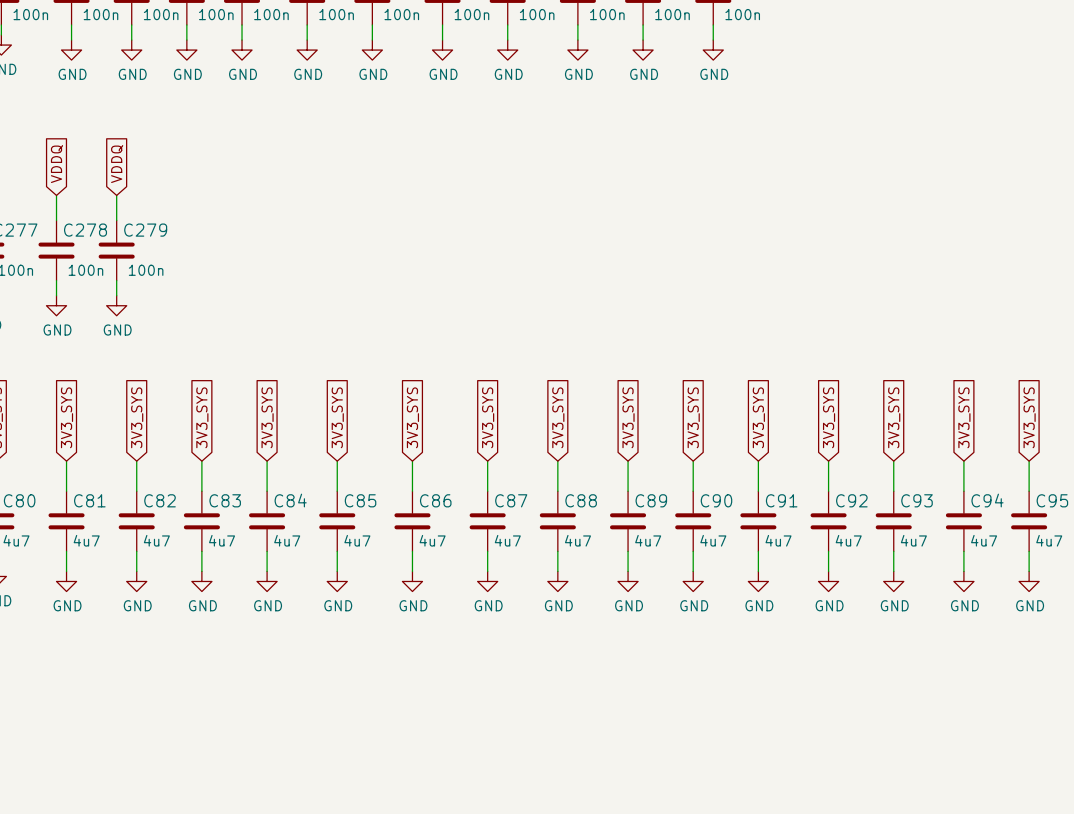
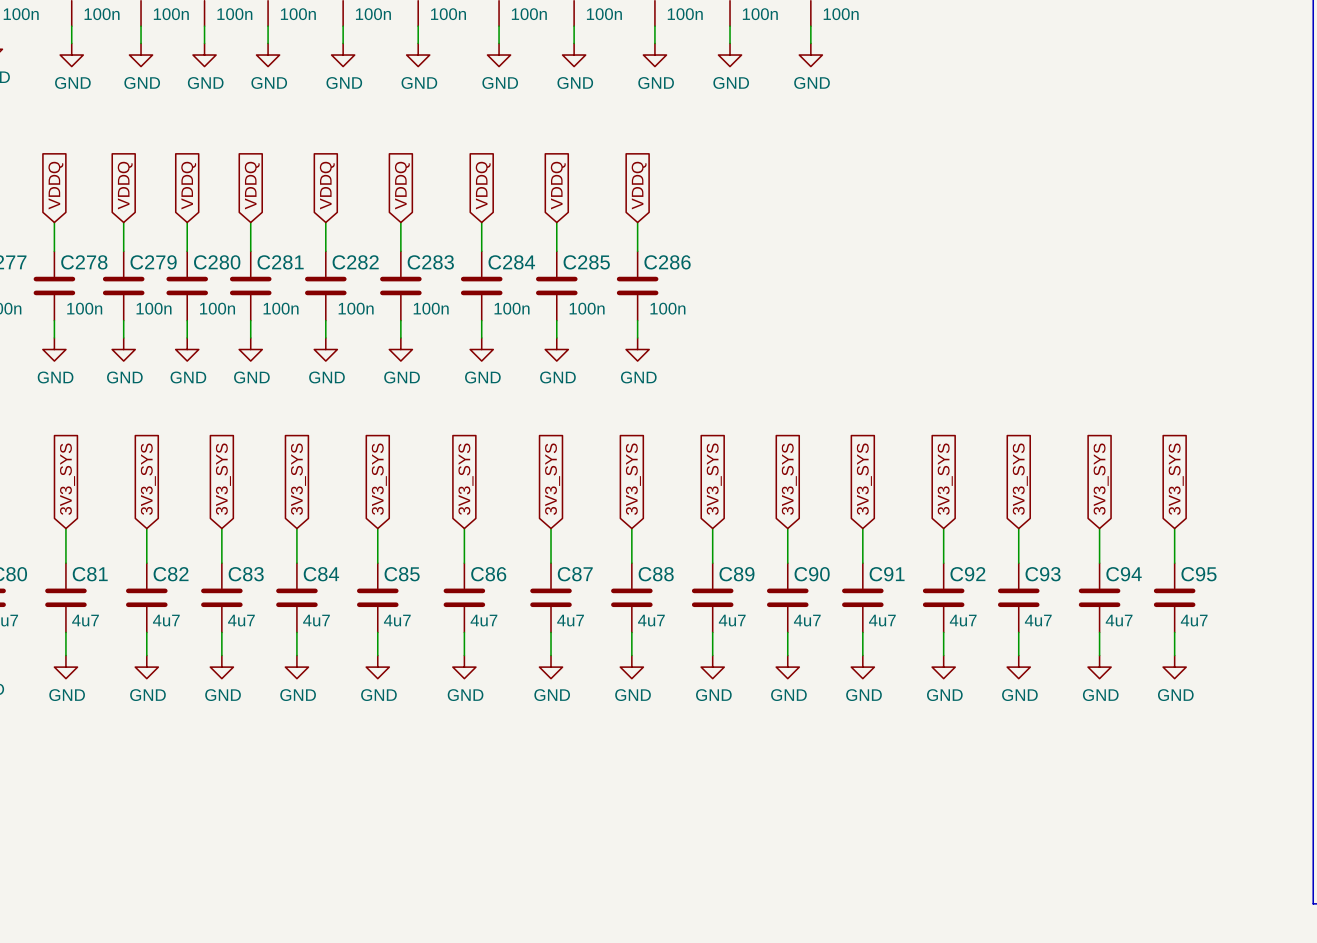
global label: none -> VDDQ (188, 185)
global label: none -> VDDQ (252, 185)
global label: none -> VDDQ (327, 185)
global label: none -> VDDQ (402, 185)
global label: none -> VDDQ (483, 185)
global label: none -> VDDQ (558, 185)
global label: none -> VDDQ (639, 185)
wire: none -> (187, 222) (187, 251)
wire: none -> (250, 222) (250, 251)
wire: none -> (325, 222) (325, 251)
wire: none -> (400, 222) (400, 251)
wire: none -> (481, 222) (481, 251)
wire: none -> (556, 222) (556, 251)
wire: none -> (637, 222) (637, 251)
C280: none -> (187, 285)
C281: none -> (250, 285)
C282: none -> (325, 285)
C283: none -> (400, 285)
C284: none -> (481, 285)
C285: none -> (556, 285)
C286: none -> (637, 285)
wire: none -> (187, 320) (187, 337)
wire: none -> (250, 320) (250, 337)
wire: none -> (325, 320) (325, 337)
wire: none -> (400, 320) (400, 337)
wire: none -> (481, 320) (481, 337)
wire: none -> (556, 320) (556, 337)
wire: none -> (637, 320) (637, 337)
power symbol: none -> GND (187, 349)
power symbol: none -> GND (250, 349)
power symbol: none -> GND (325, 349)
power symbol: none -> GND (400, 349)
power symbol: none -> GND (481, 349)
power symbol: none -> GND (556, 349)
power symbol: none -> GND (637, 349)

